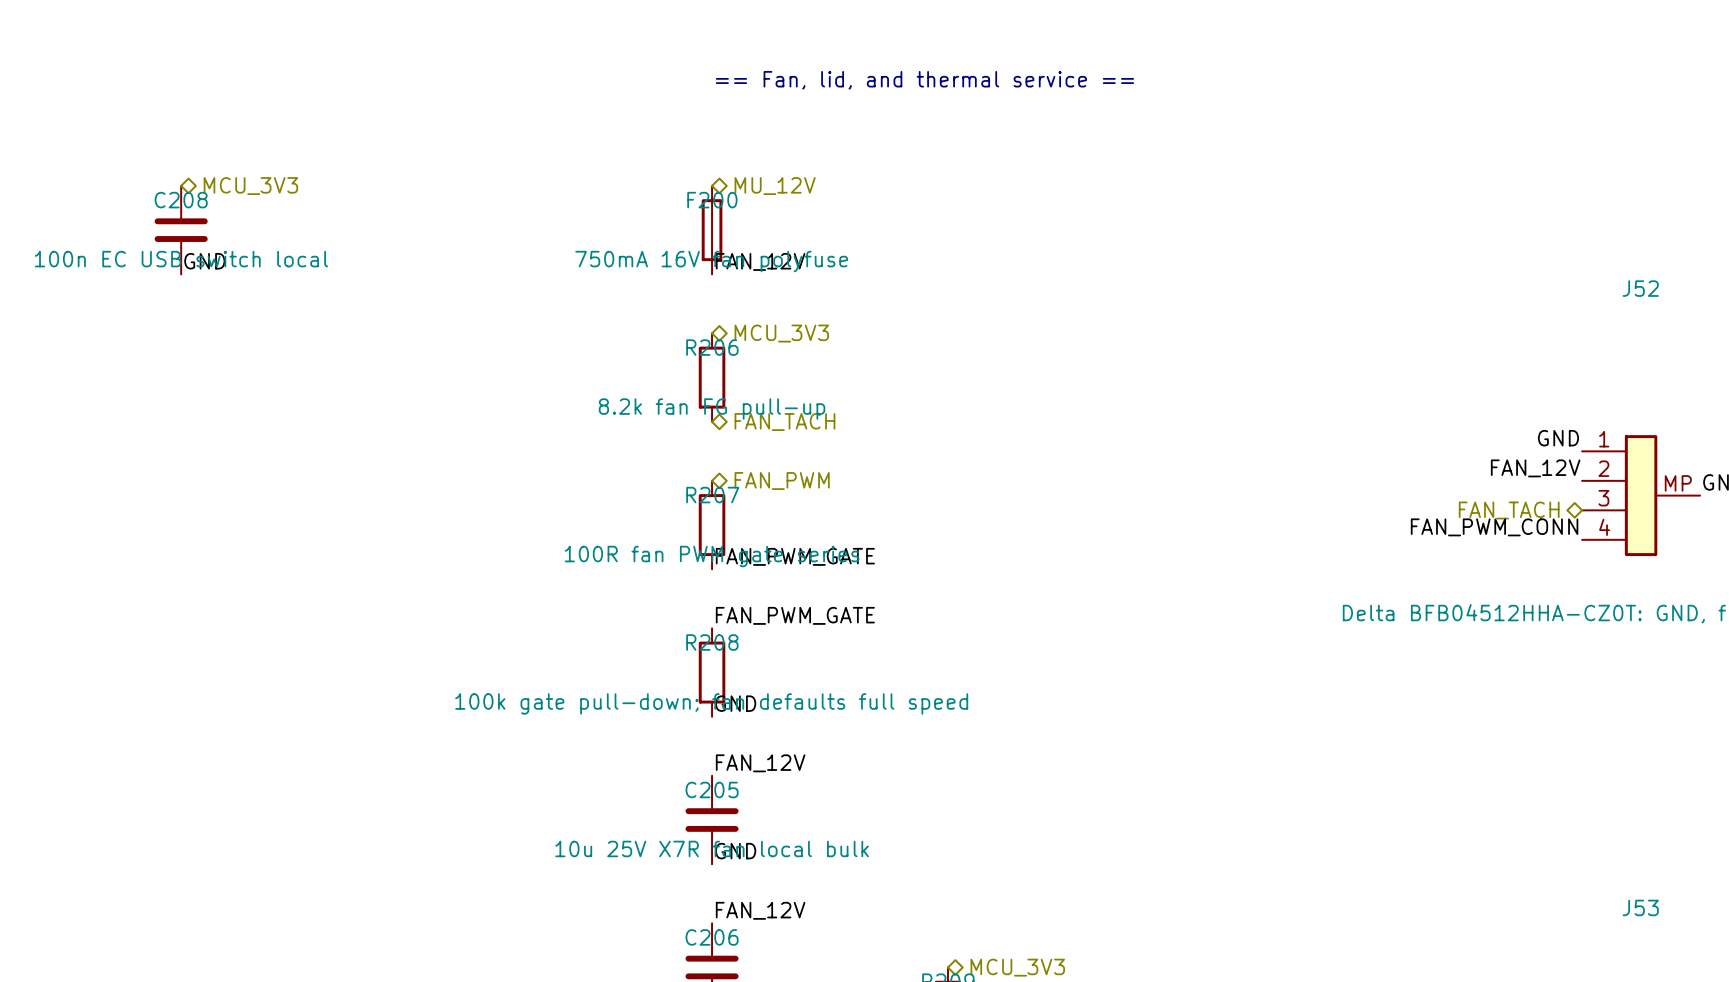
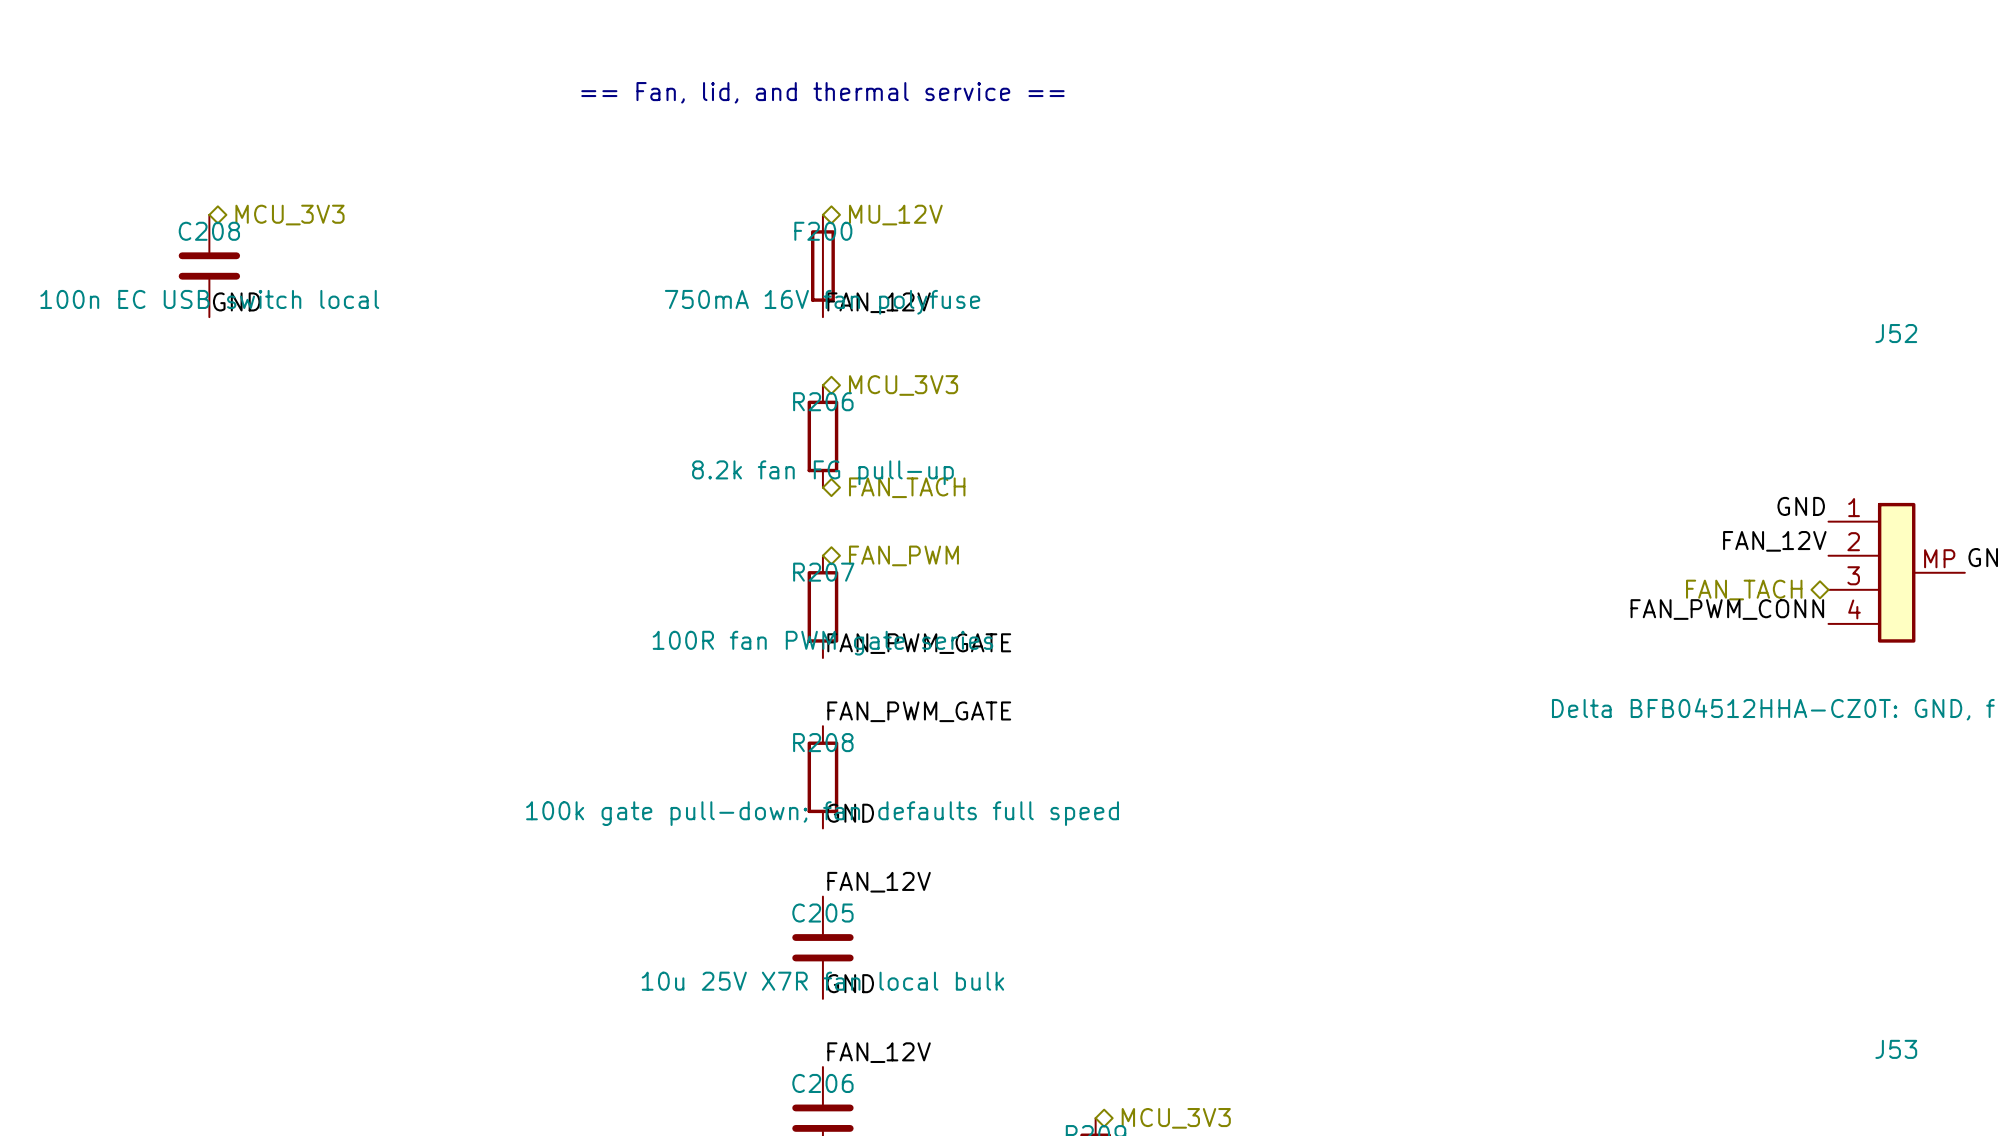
text position: == Fan, lid, and thermal service == (924, 80) -> == Fan, lid, and thermal service == (822, 92)

